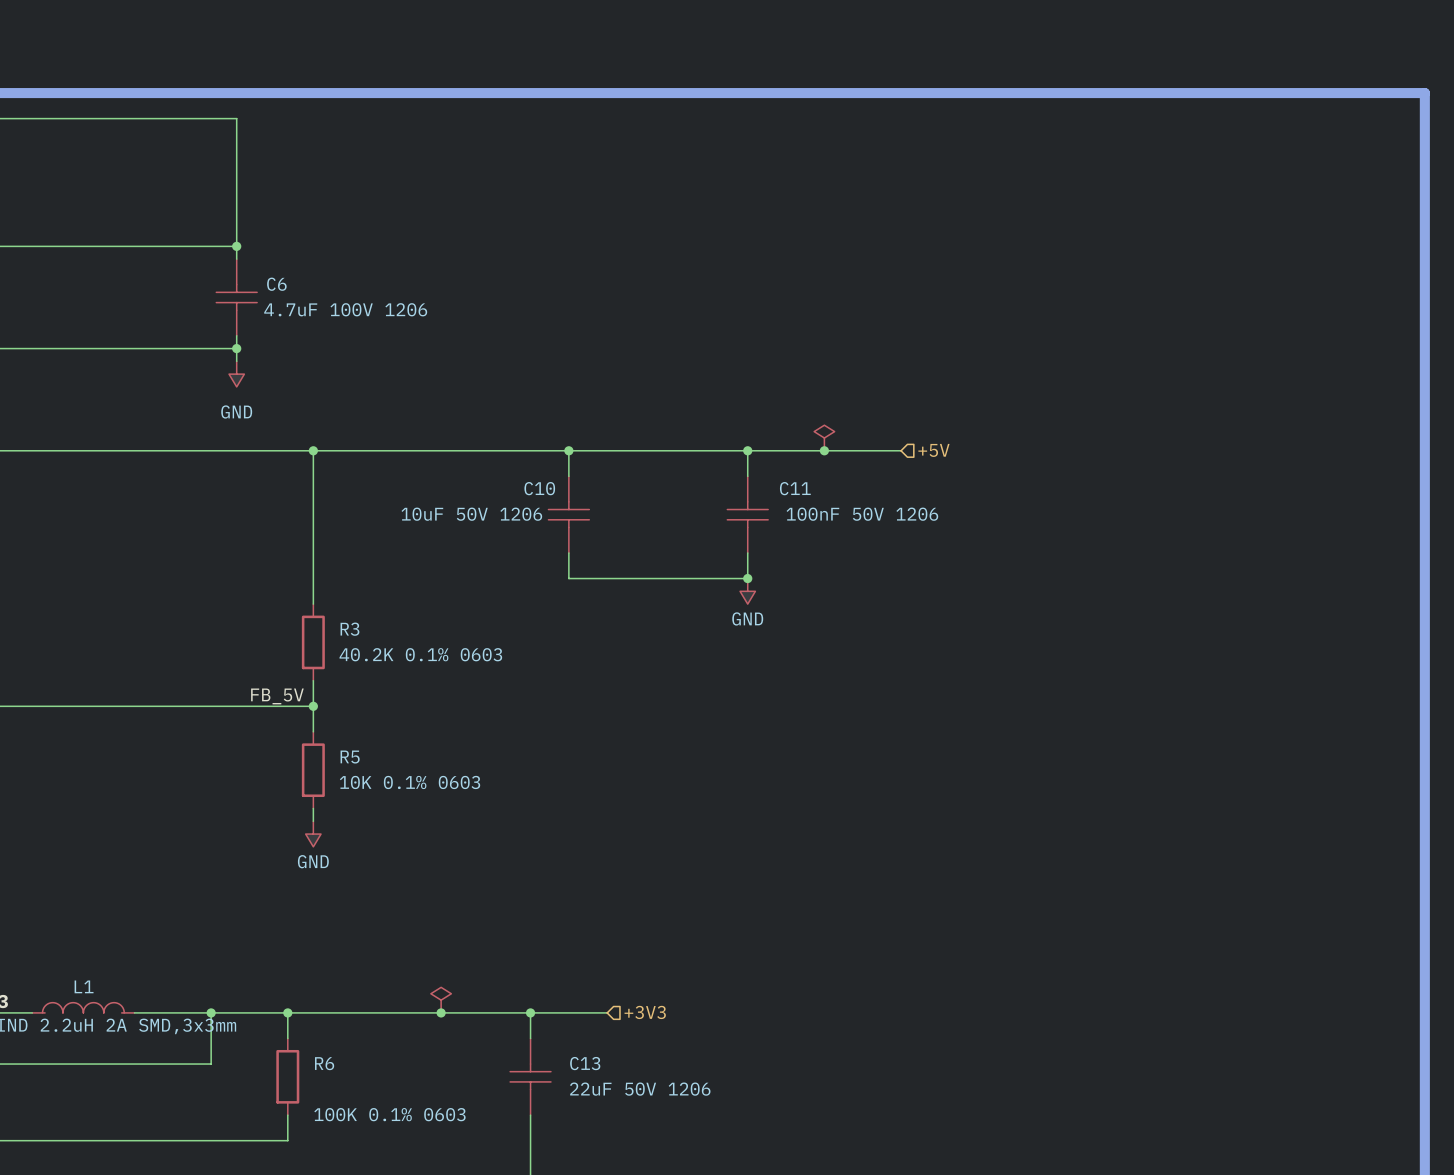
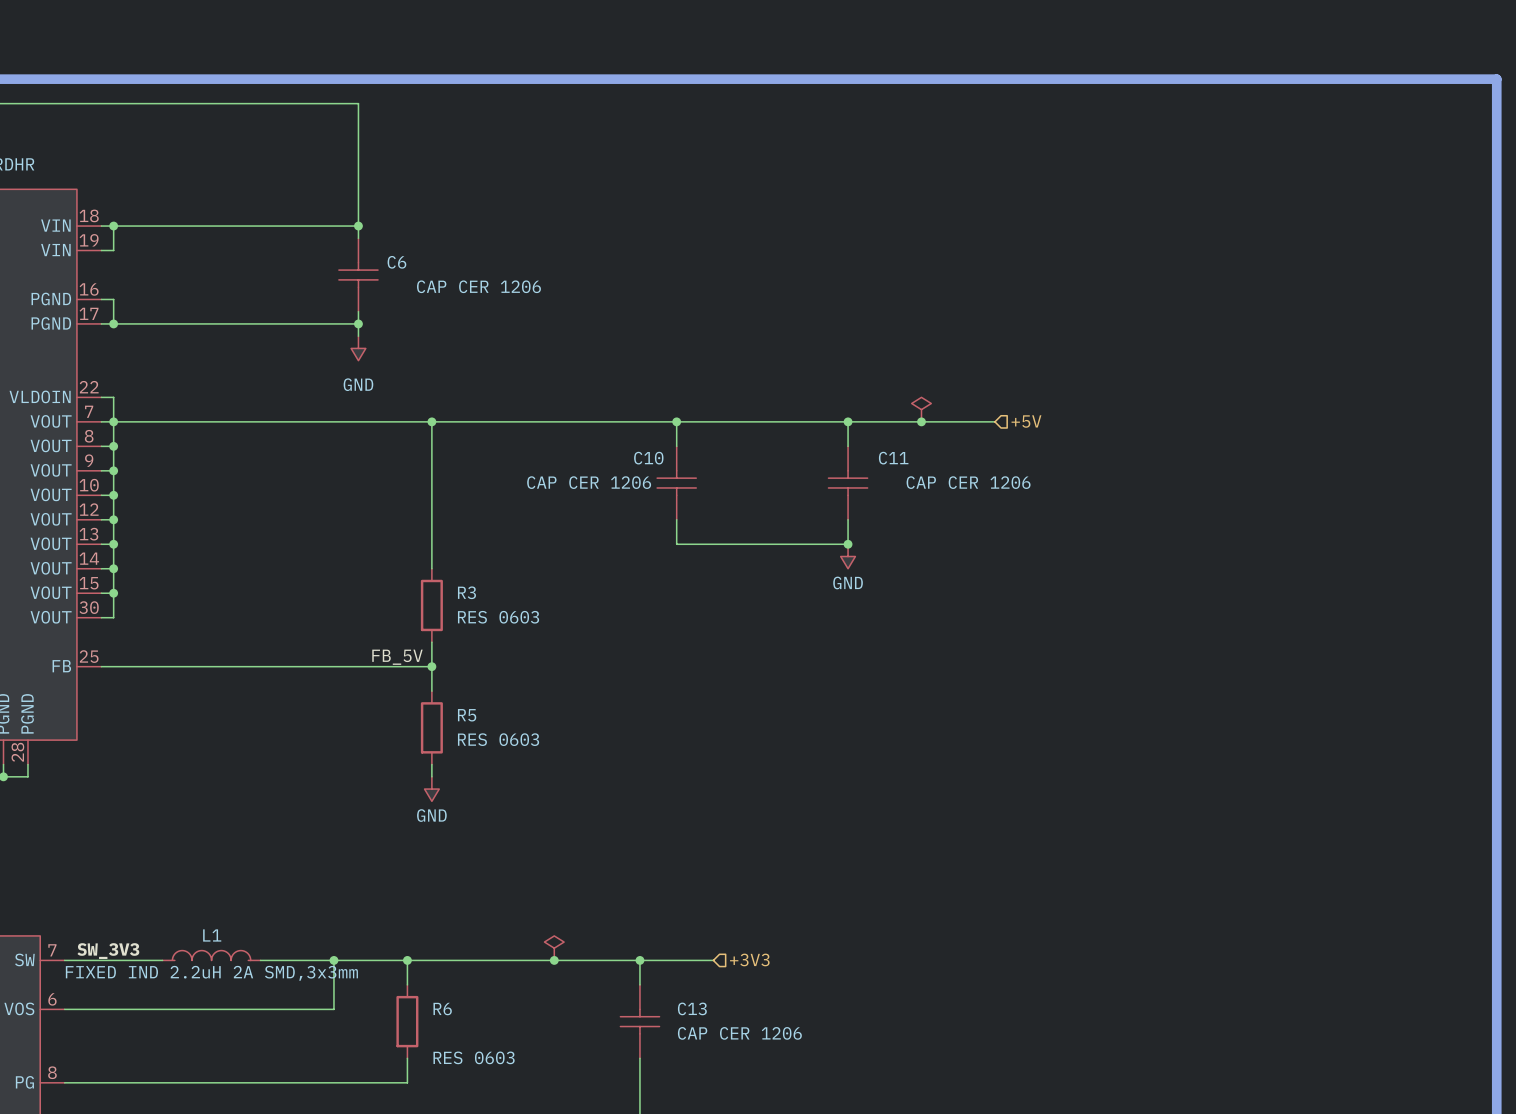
C6 value: 4.7uF 100V 1206 (345, 309) -> CAP CER 1206 (478, 286)
C10 value: 10uF 50V 1206 (471, 514) -> CAP CER 1206 (589, 482)
C11 value: 100nF 50V 1206 (862, 514) -> CAP CER 1206 (968, 482)
R3 value: 40.2K 0.1% 0603 (420, 654) -> RES 0603 (498, 617)
R5 value: 10K 0.1% 0603 (410, 782) -> RES 0603 (498, 739)
C13 value: 22uF 50V 1206 (640, 1089) -> CAP CER 1206 (739, 1033)
R6 value: 100K 0.1% 0603 (389, 1114) -> RES 0603 (474, 1057)

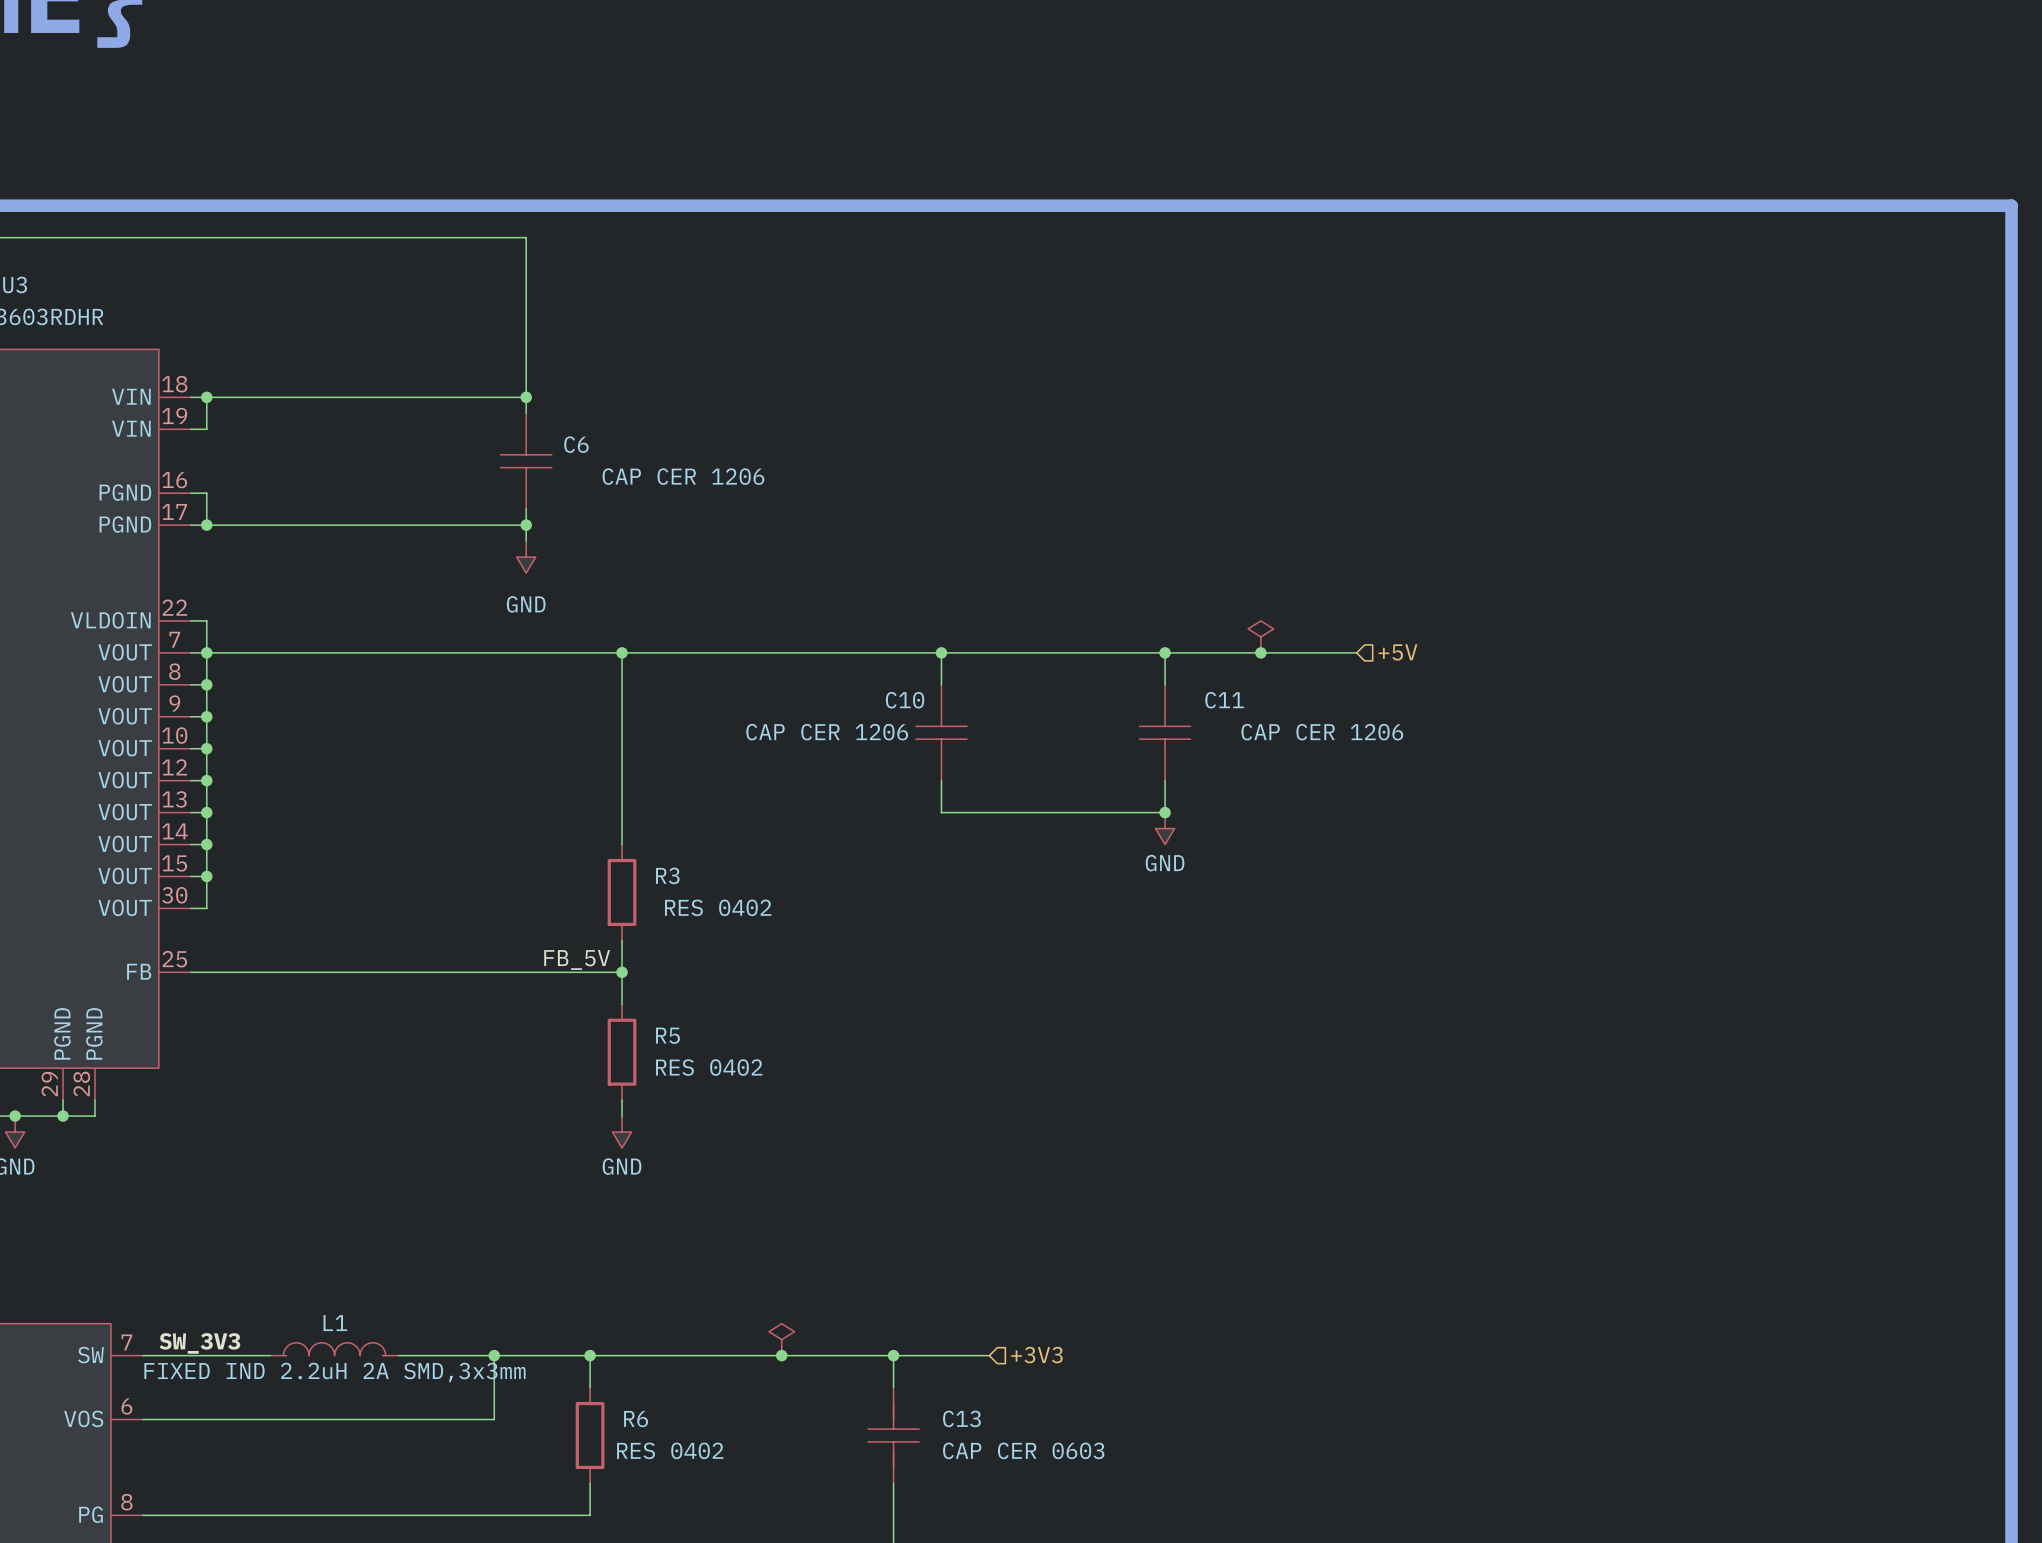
R3 value: RES 0603 (498, 617) -> RES 0402 (718, 907)
R5 value: RES 0603 (498, 739) -> RES 0402 (709, 1067)
C13 symbol: [620, 984, 660, 1059] -> [868, 1387, 920, 1484]
C13 value: CAP CER 1206 (739, 1033) -> CAP CER 0603 (1023, 1450)
R6 value: RES 0603 (474, 1057) -> RES 0402 (670, 1450)

